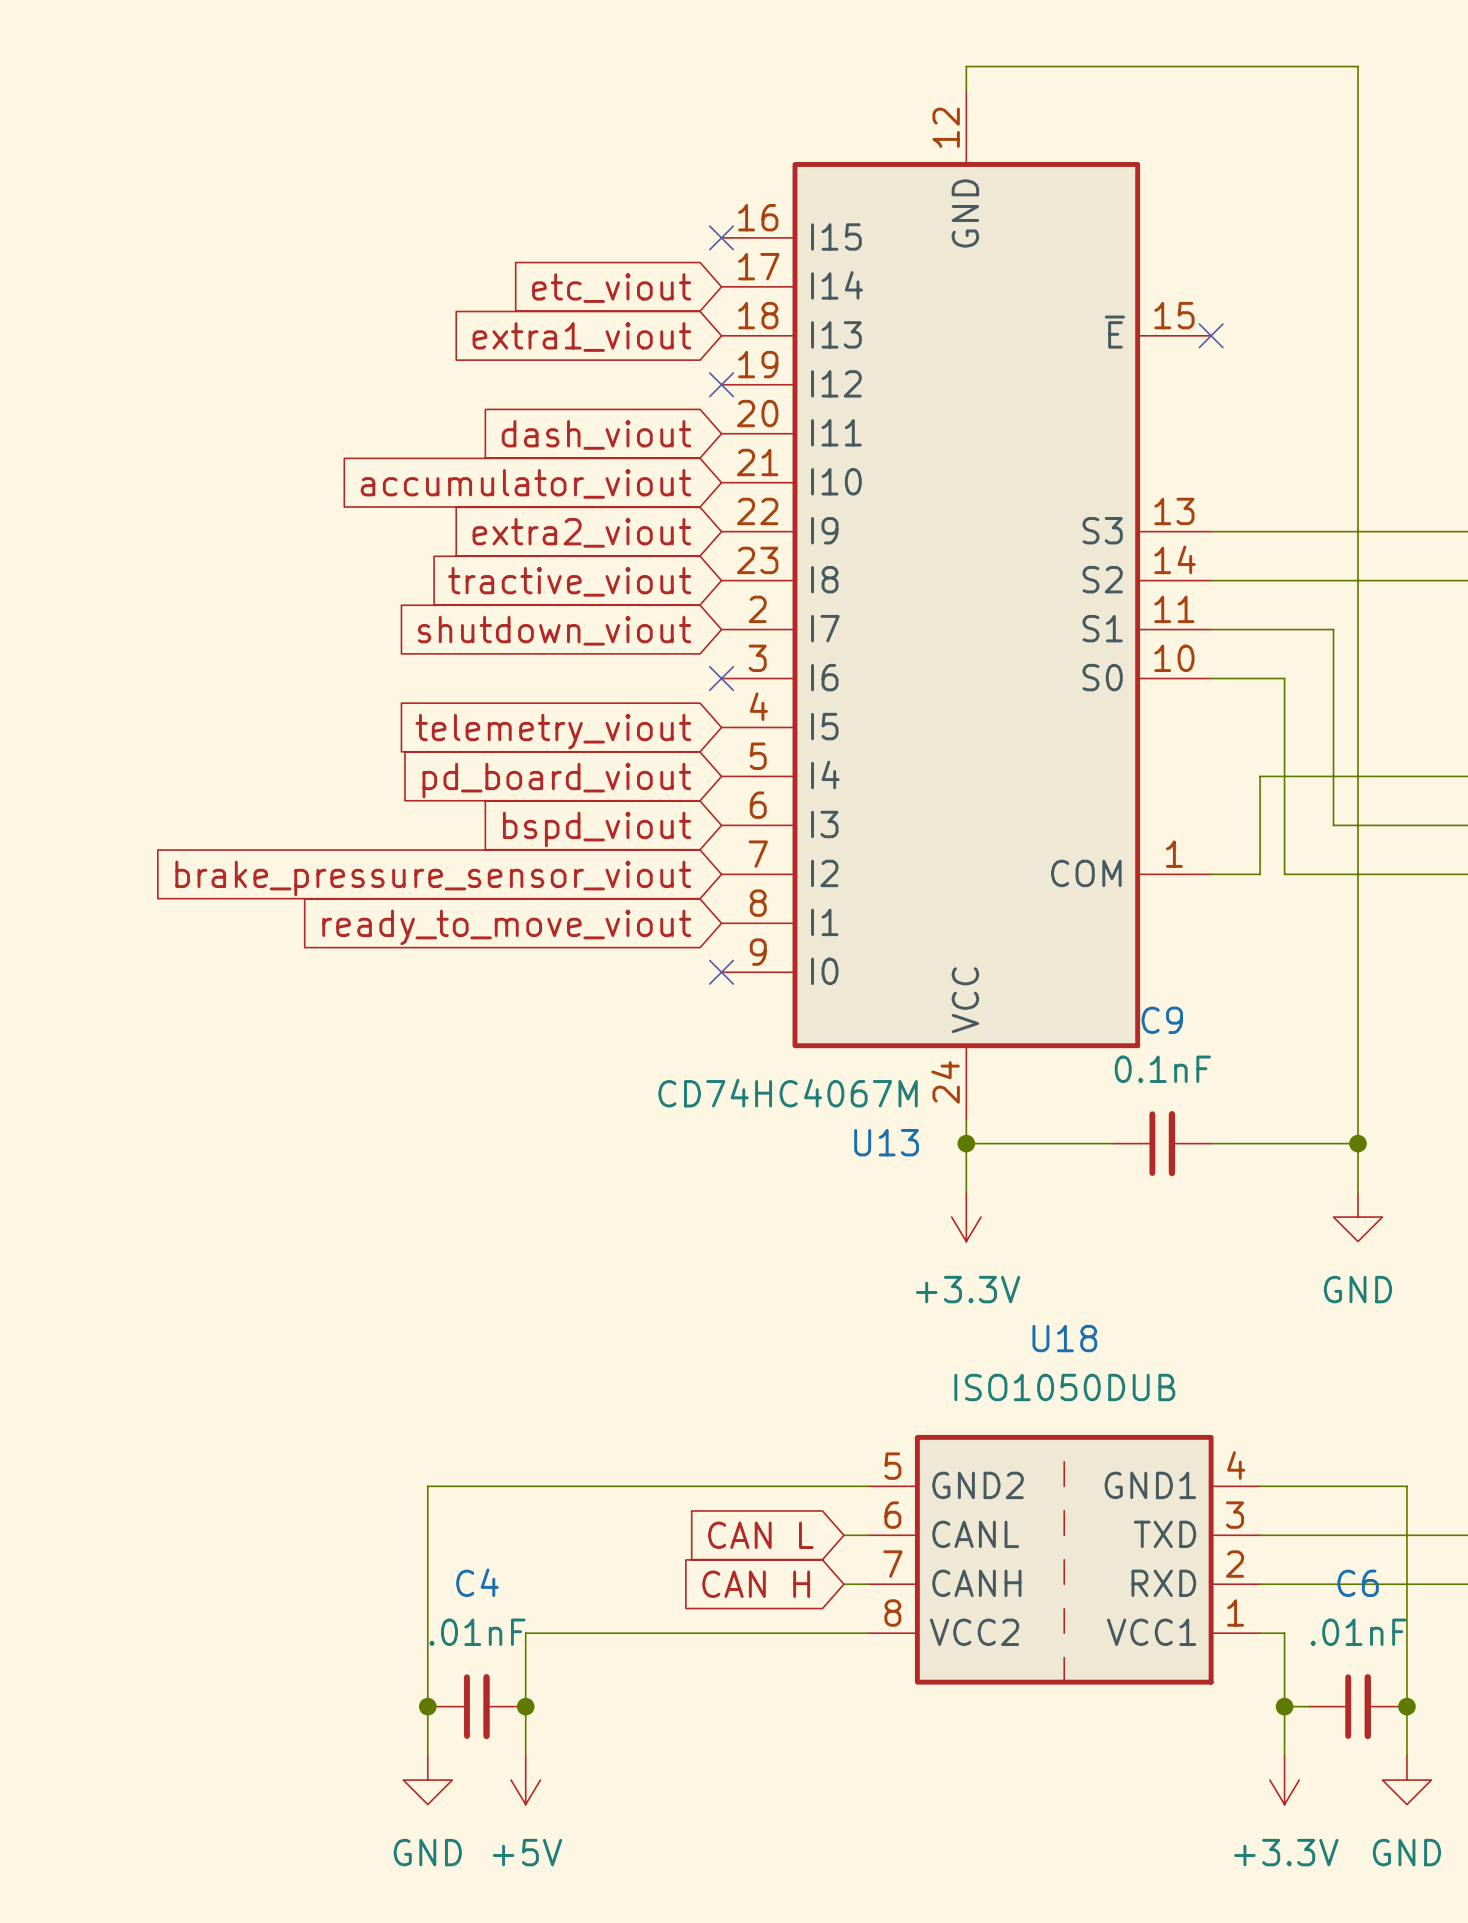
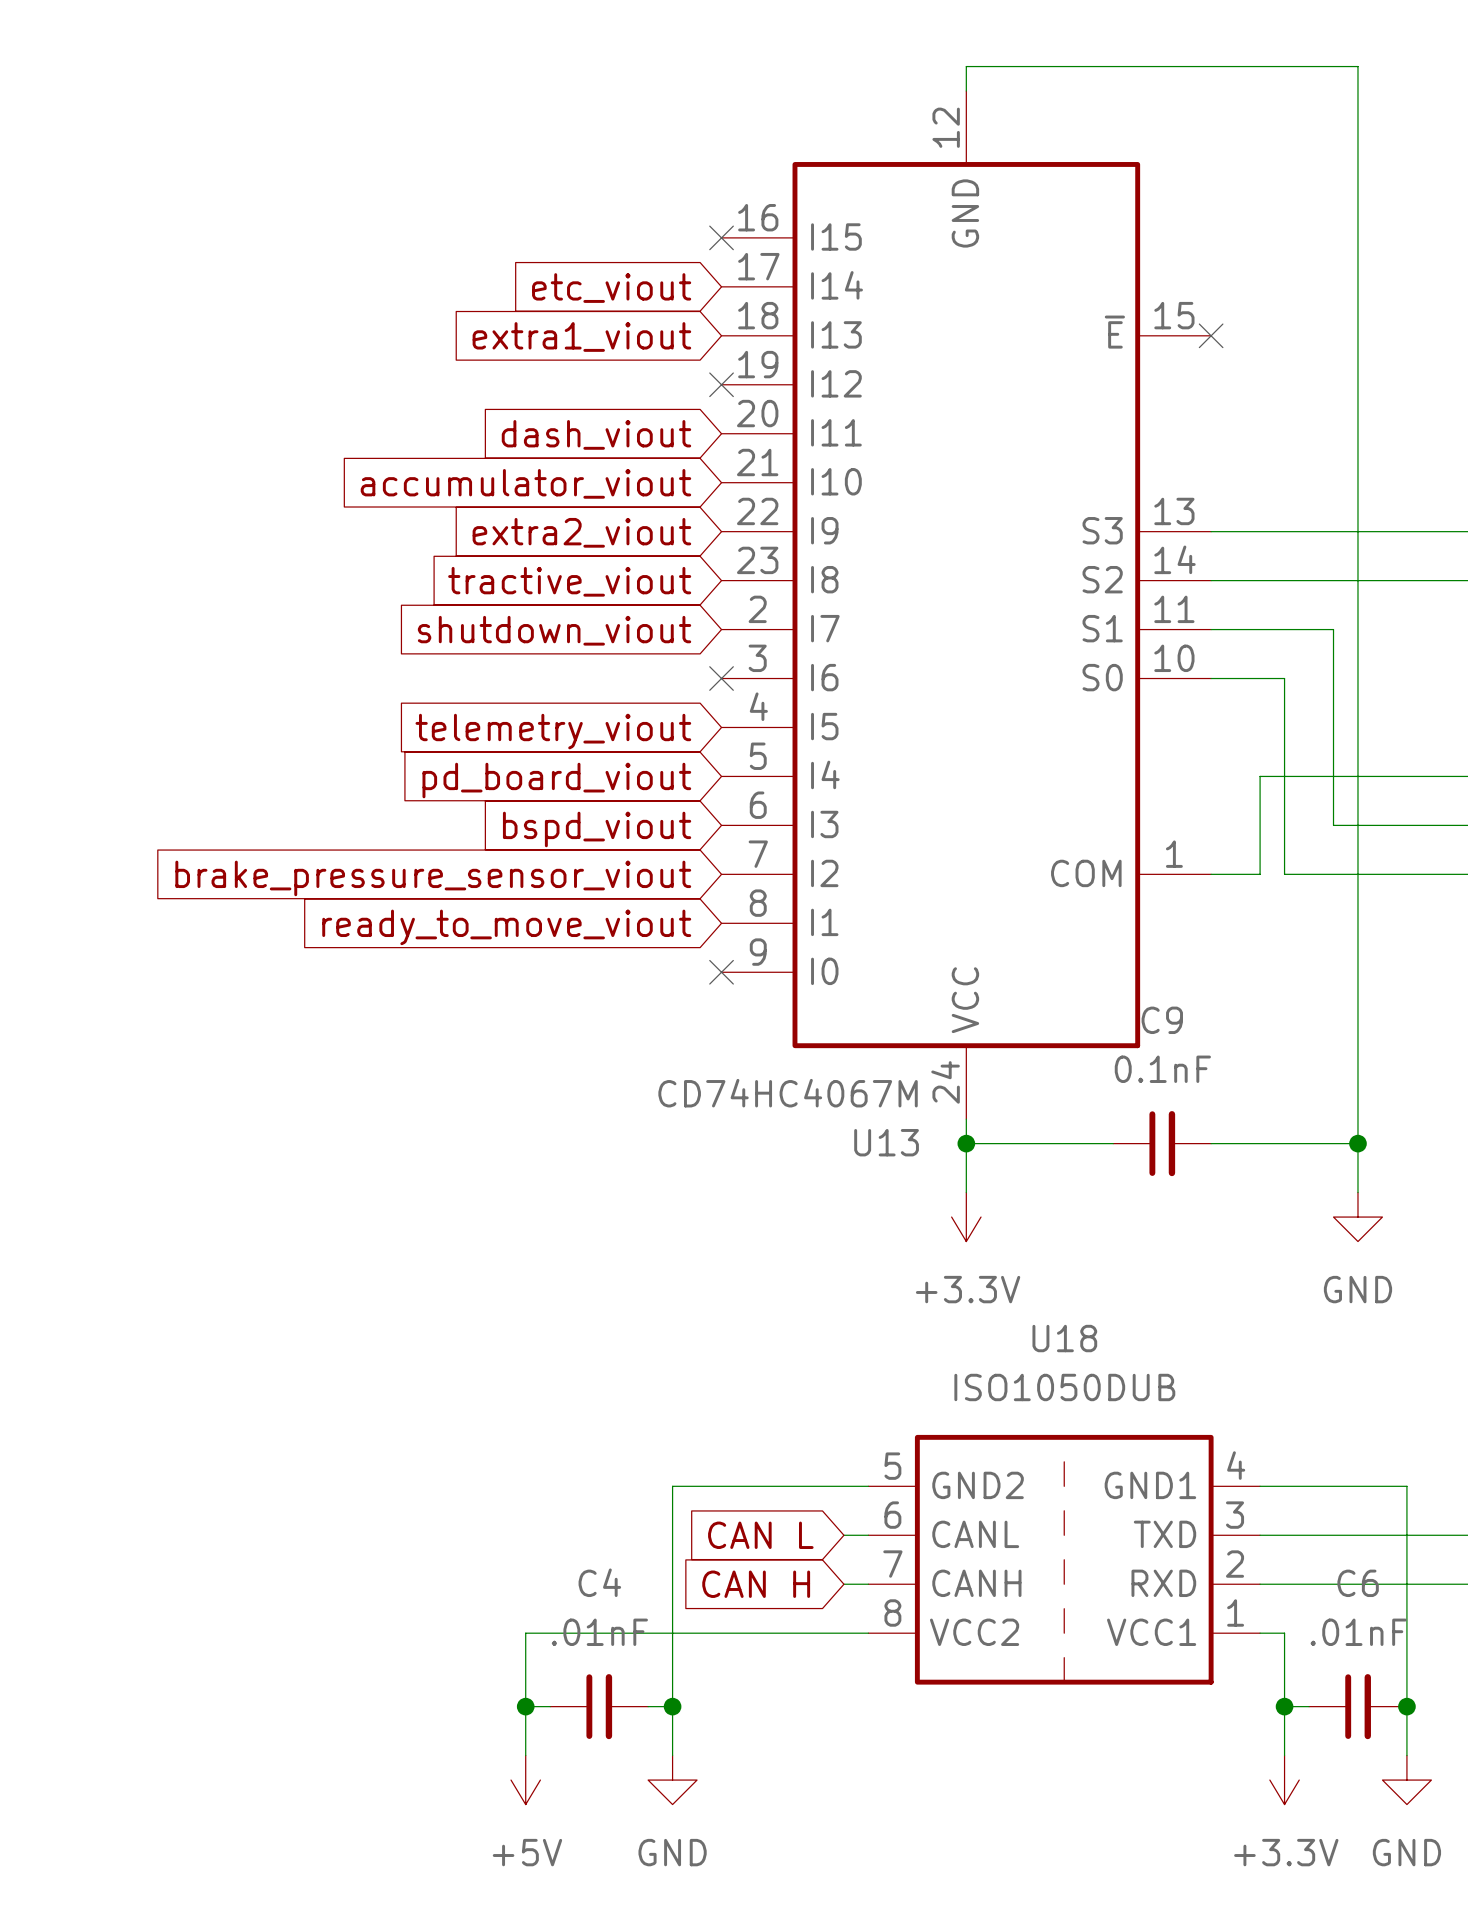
wire: (672, 1486) (427, 1486) (427, 1755) -> (672, 1486) (672, 1755)
junction: (427, 1706) -> none
C4 position: (476, 1706) -> (599, 1706)
wire: none -> (525, 1706) (550, 1706)
wire: none -> (648, 1706) (672, 1706)
junction: none -> (672, 1706)
power symbol position: GND (427, 1780) -> GND (672, 1780)

